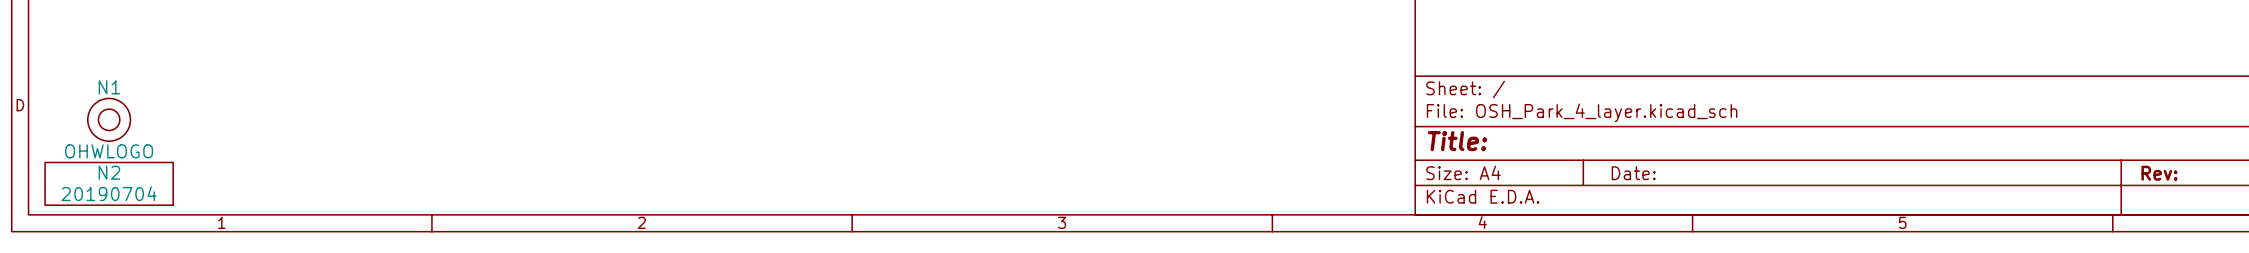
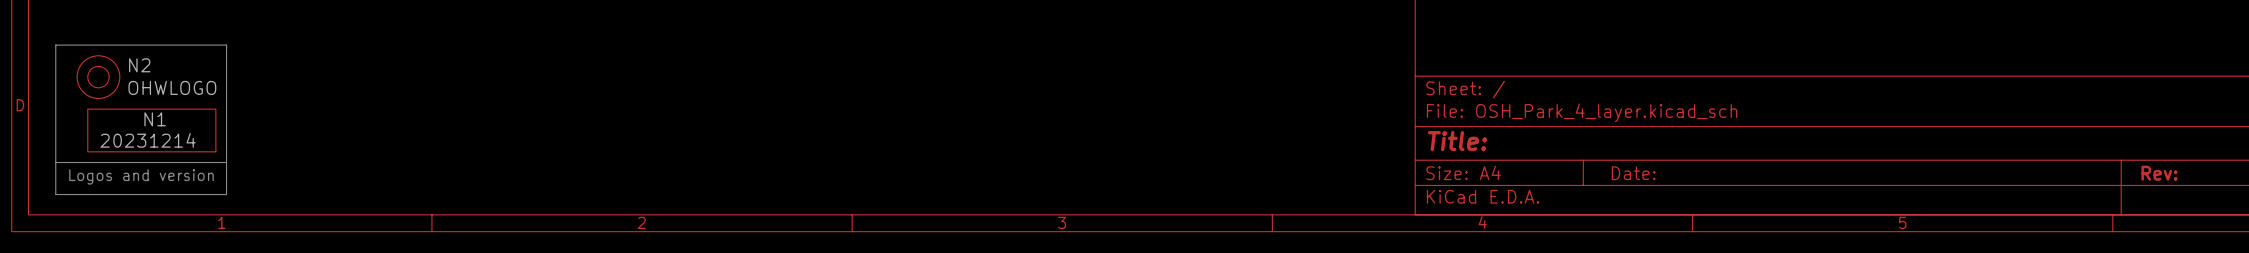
line: none -> (55, 45) (55, 194) (226, 194) (226, 45) (55, 45)
N1 name position: N1 (109, 87) -> N1 (155, 119)
N1 symbol: [87, 98, 131, 142] -> [87, 109, 216, 152]
N1 value: OHWLOGO (109, 151) -> 20231214 (148, 140)
N2 symbol: [45, 162, 174, 206] -> [77, 55, 120, 99]
line: none -> (55, 162) (226, 162)
N2 name position: N2 (109, 172) -> N2 (139, 65)
text: none -> Logos and version (141, 176)
N2 value: 20190704 (109, 193) -> OHWLOGO (172, 87)

